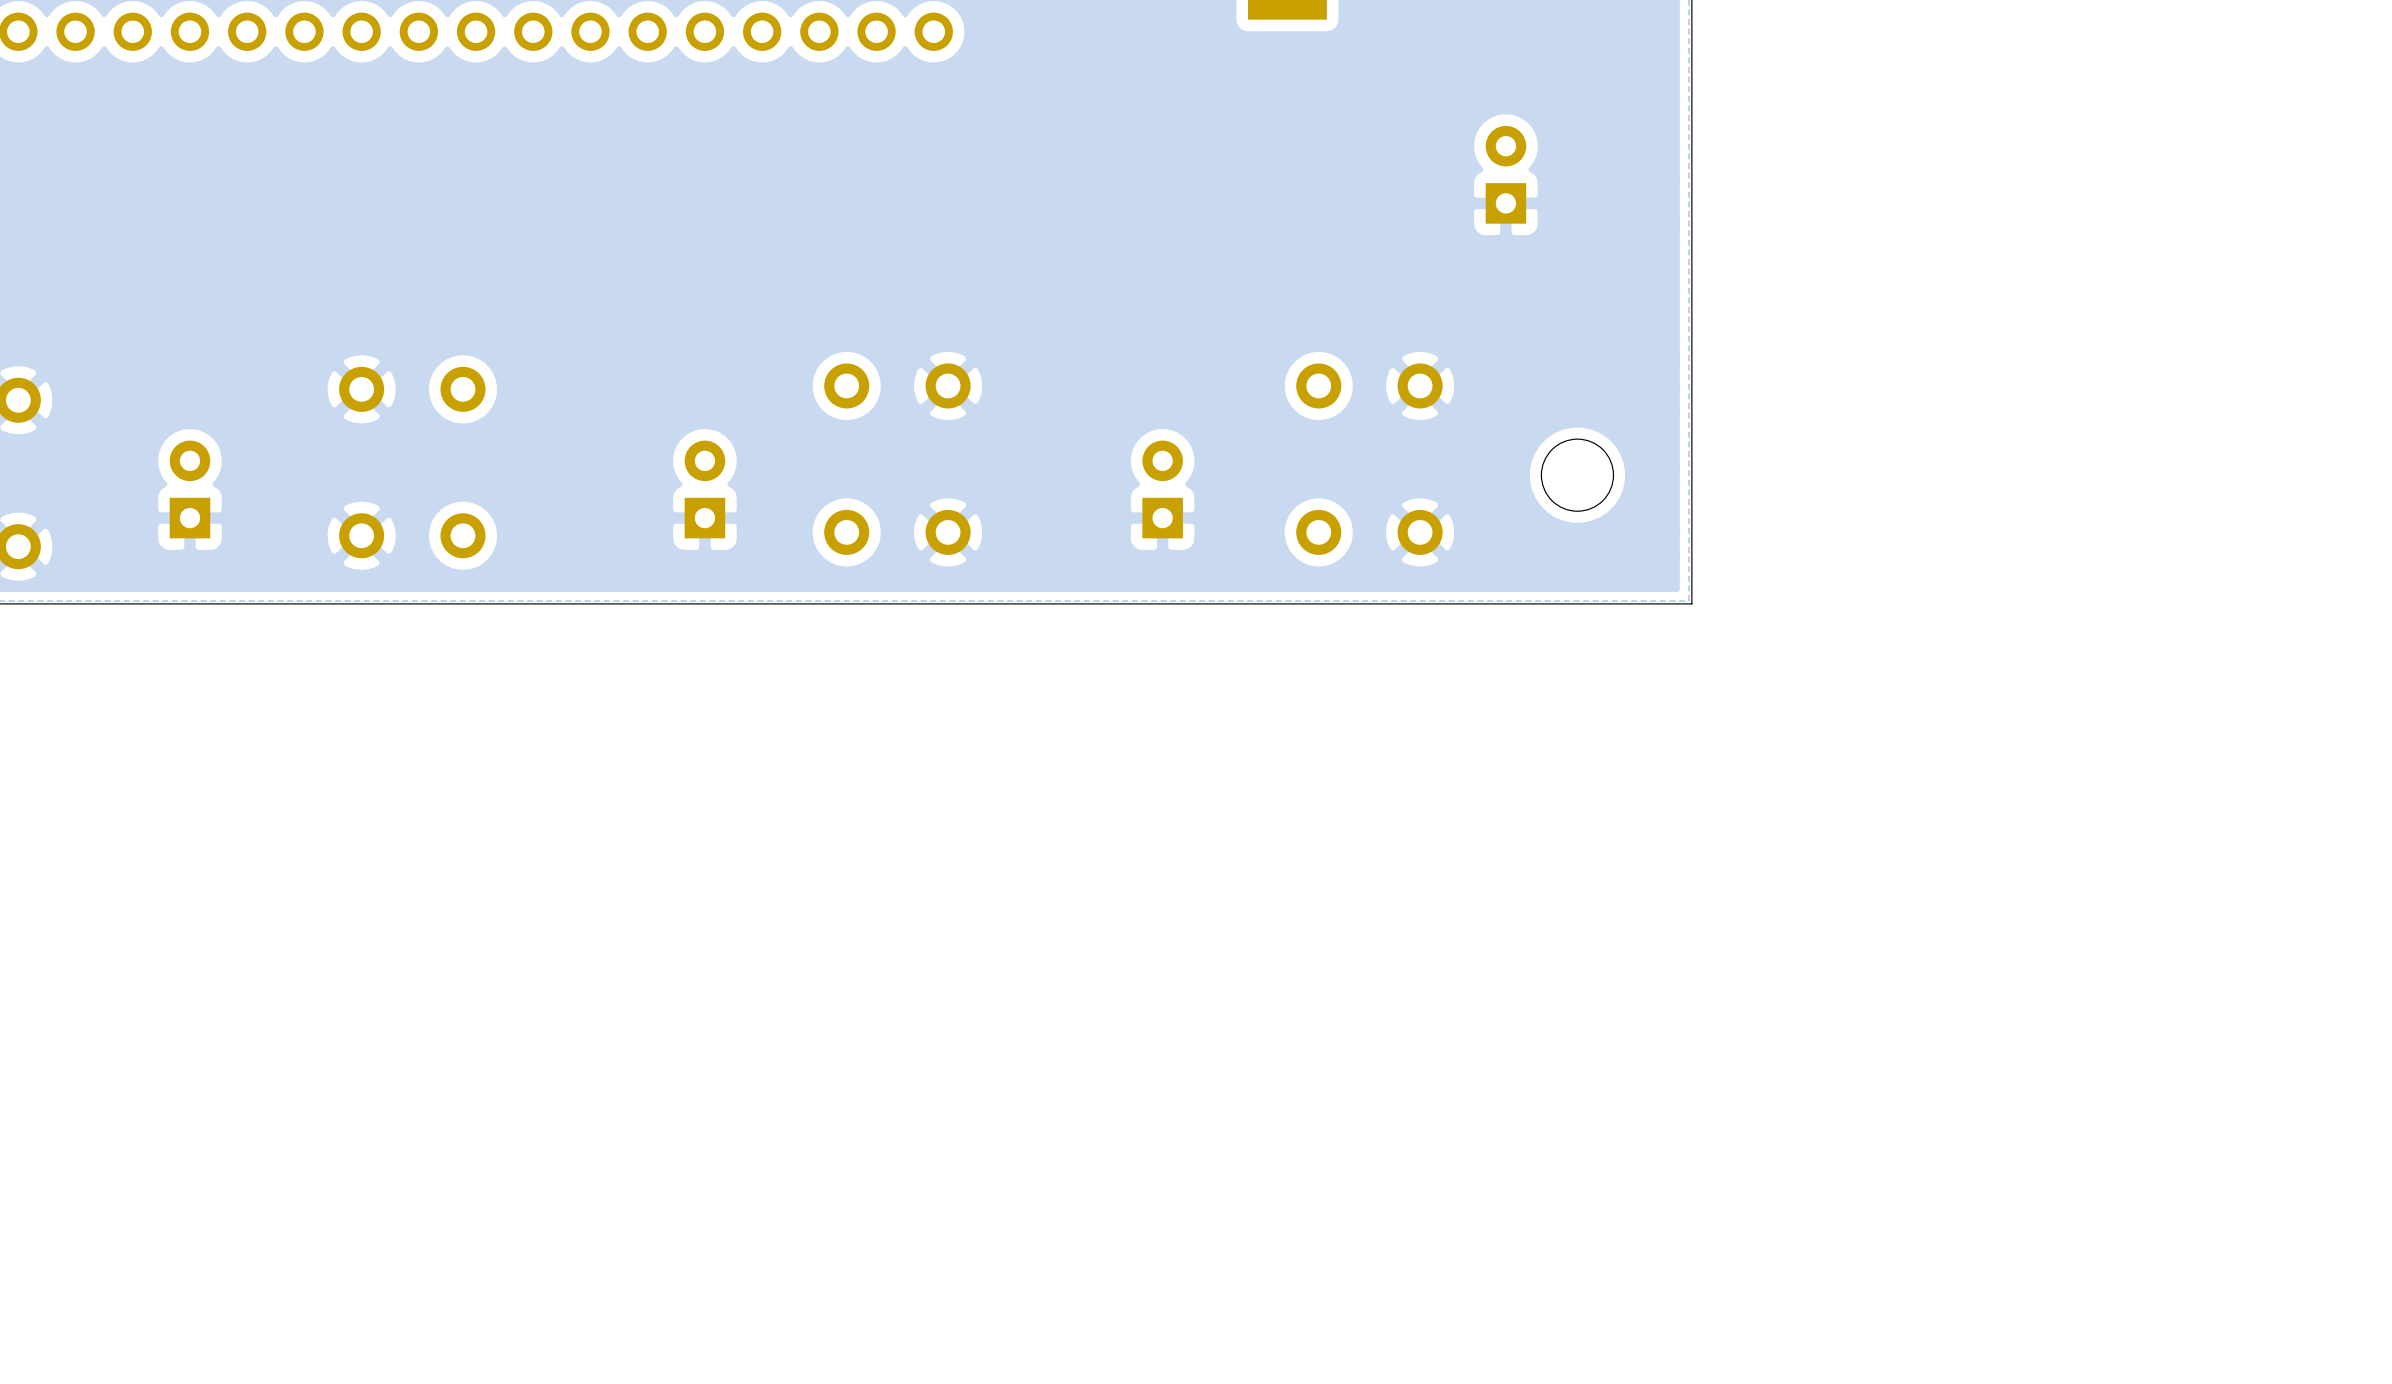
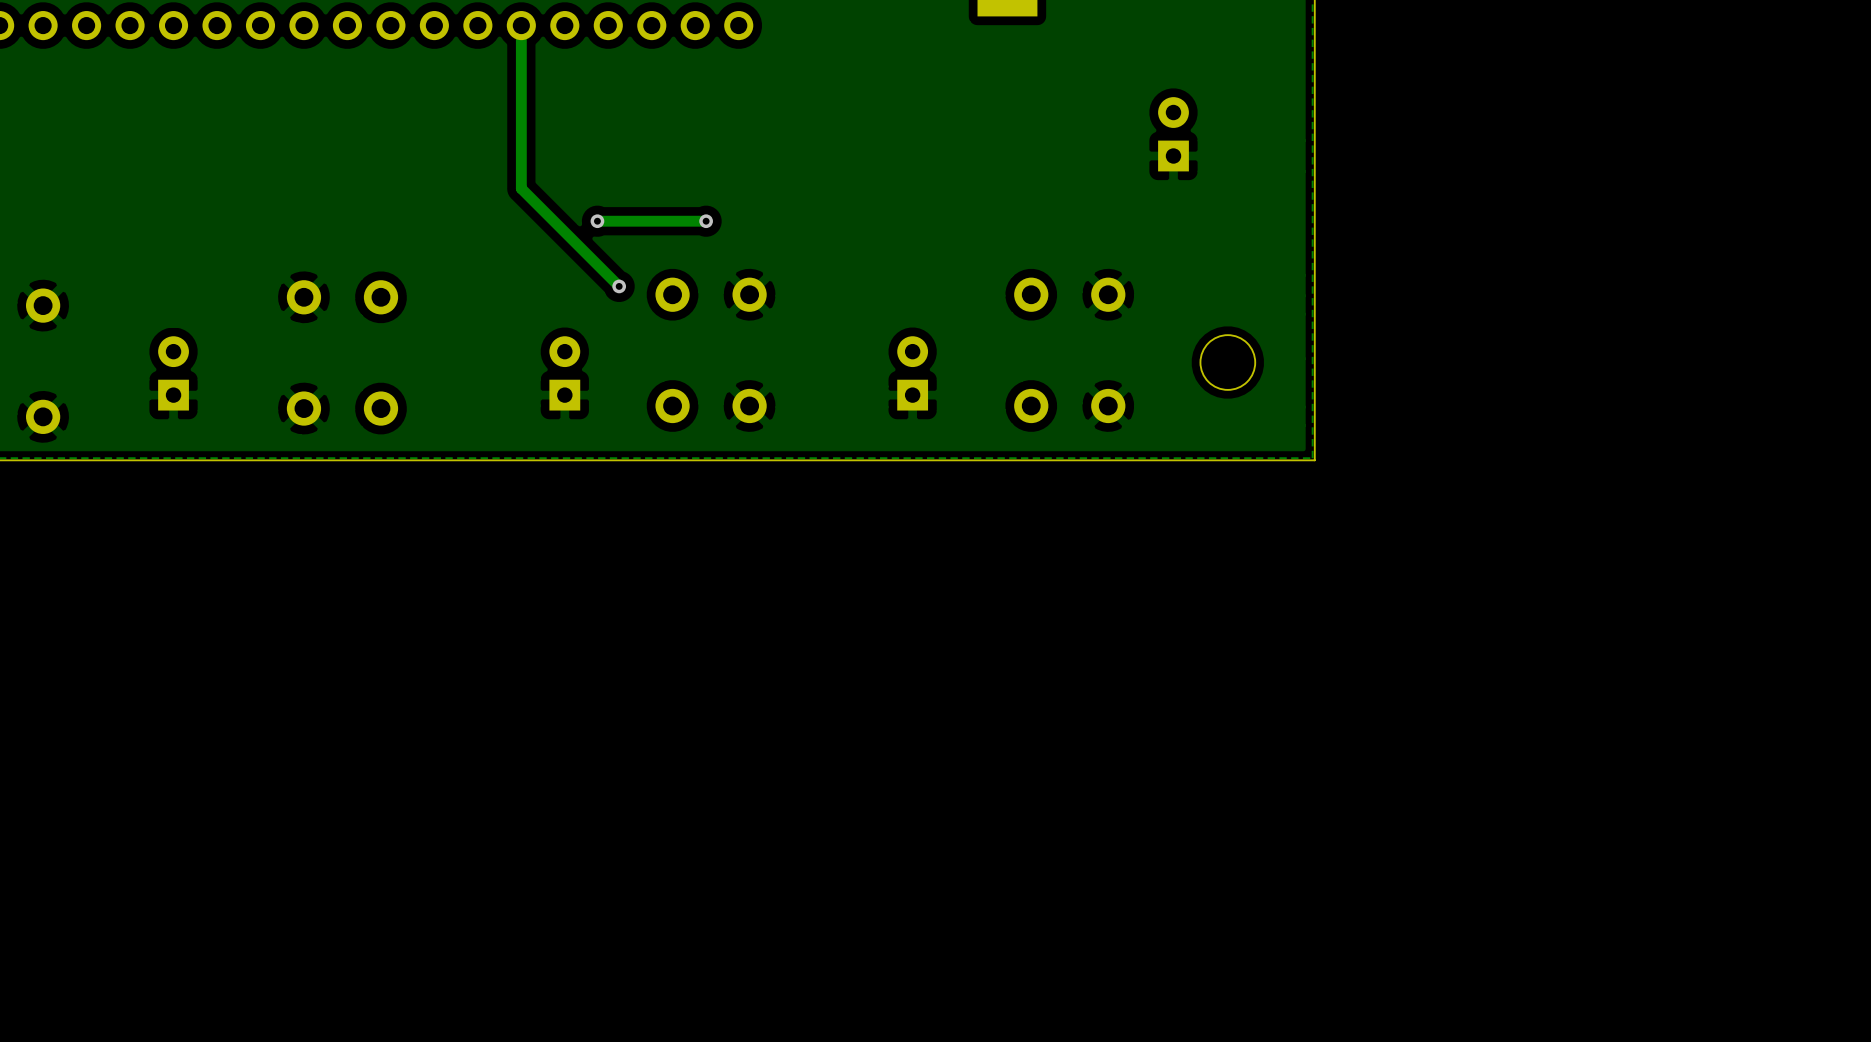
track: none -> (521, 25) (521, 188) (619, 286)
via: none -> (597, 221)
track: none -> (706, 221) (597, 221)
via: none -> (706, 221)
via: none -> (619, 286)

